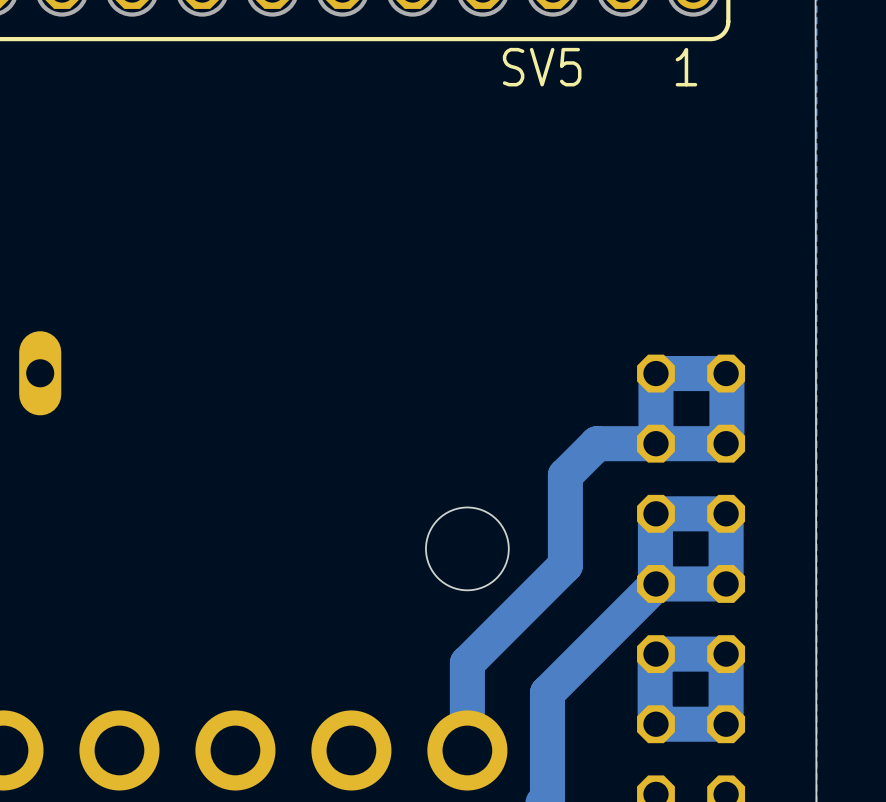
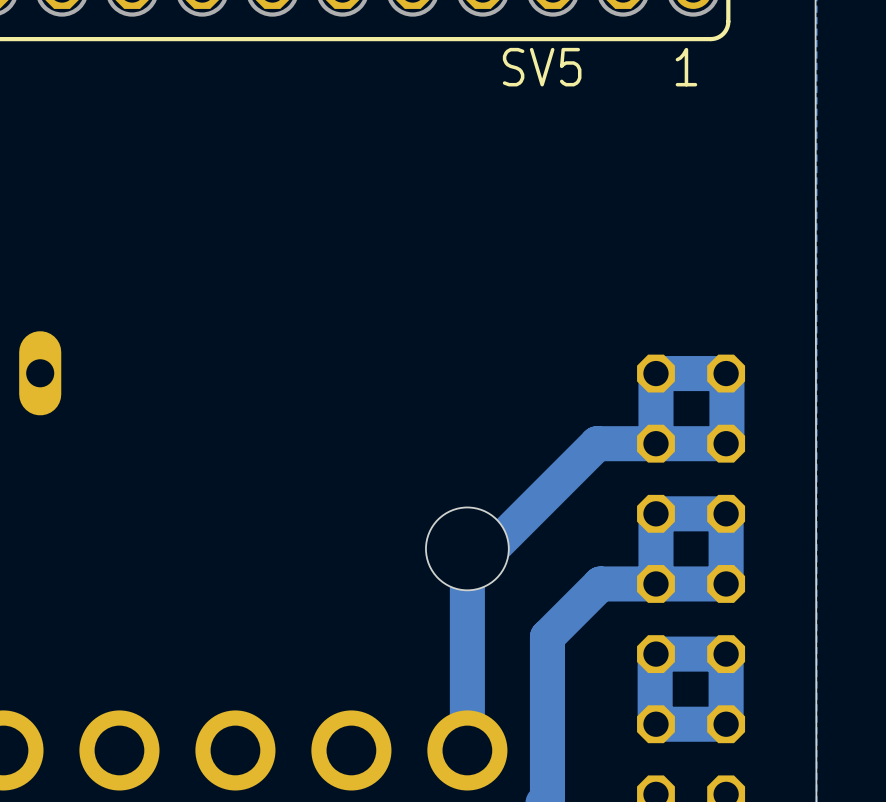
track: (565, 475) (565, 565) (467, 663) -> (565, 475) (467, 573) (467, 663)
track: (655, 514) (655, 585) (547, 693) -> (655, 513) (655, 583) (600, 583) (547, 636) (547, 693)

